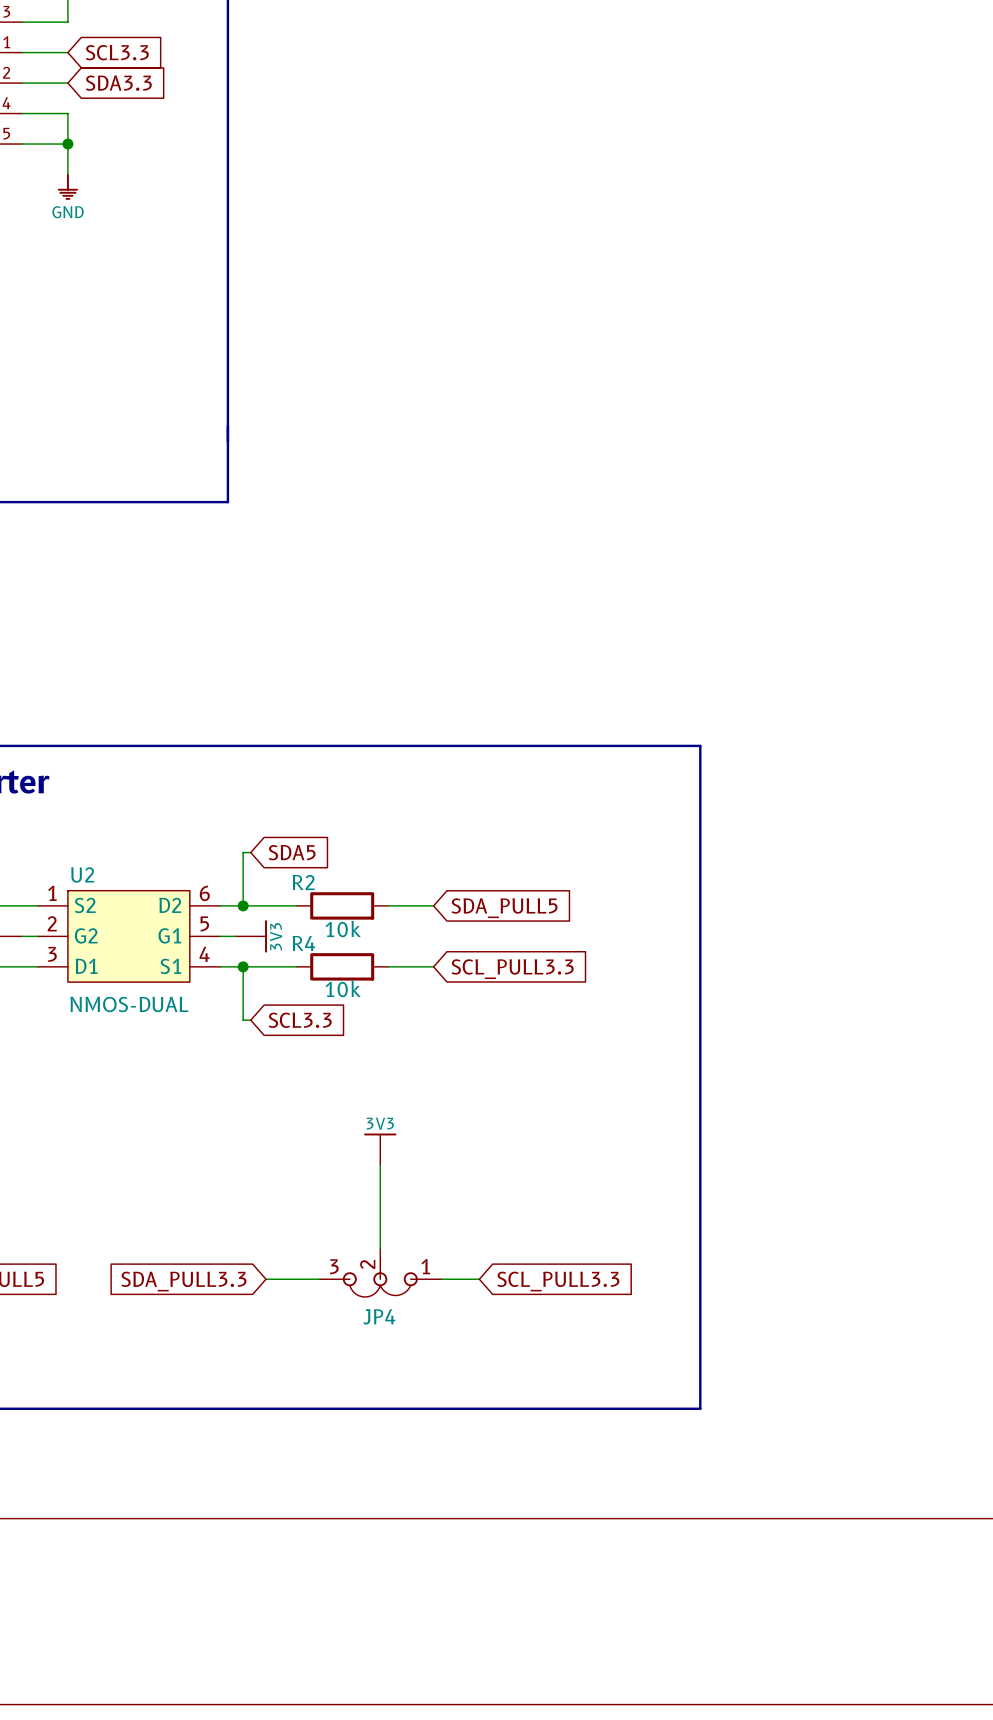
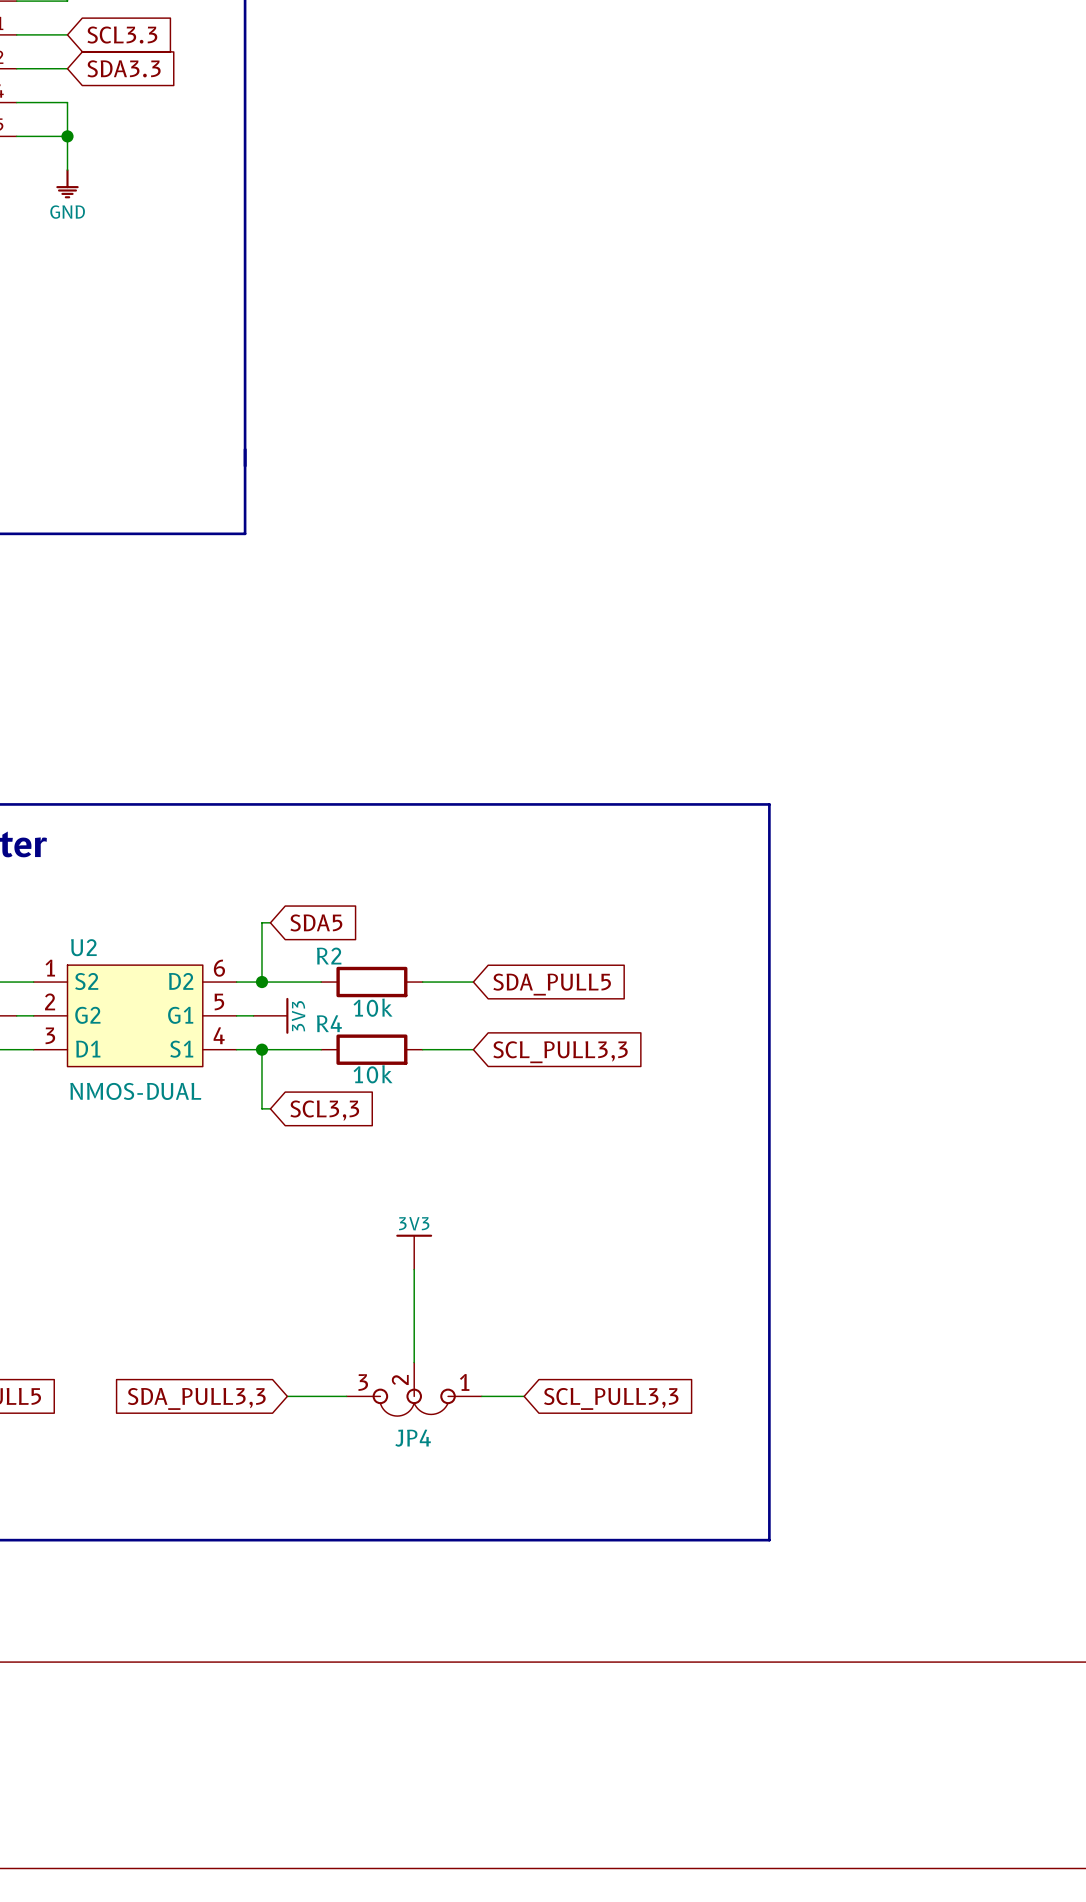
global label: SCL_PULL3.3 (512, 969) -> SCL_PULL3,3 (560, 1052)
global label: SCL3.3 (300, 1020) -> SCL3,3 (324, 1110)
global label: SDA_PULL3.3 (183, 1281) -> SDA_PULL3,3 (196, 1398)
global label: SCL_PULL3.3 (558, 1281) -> SCL_PULL3,3 (611, 1398)

